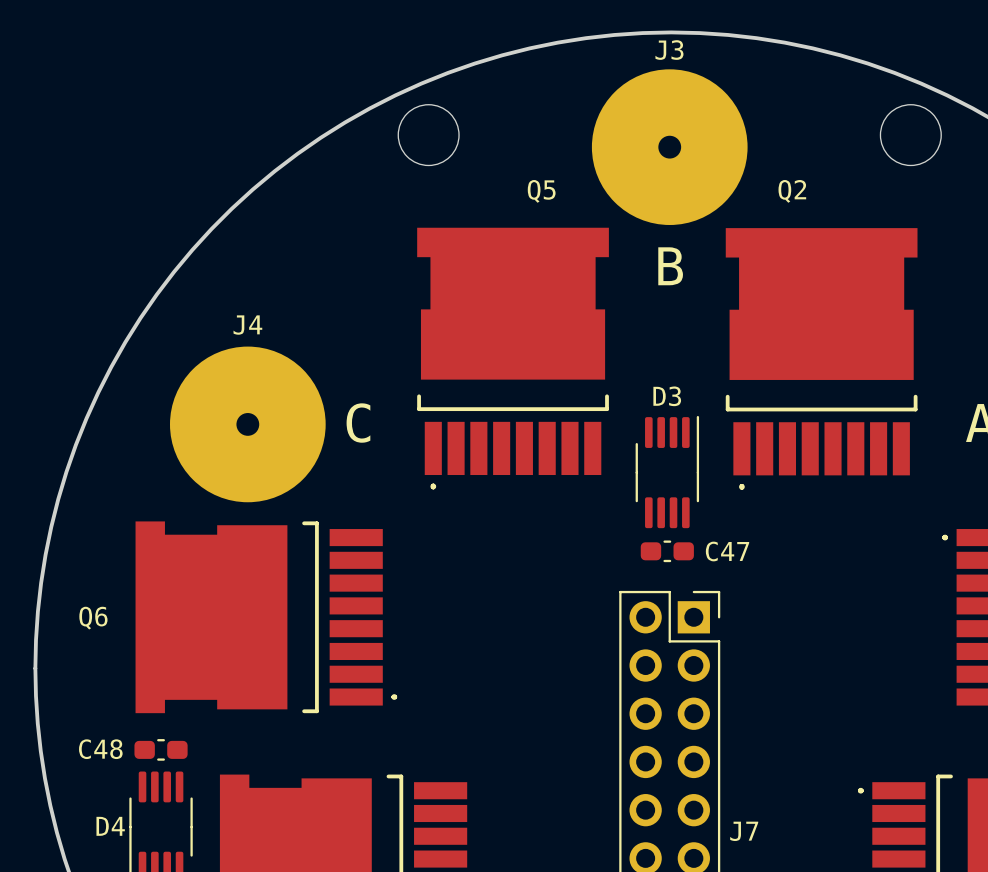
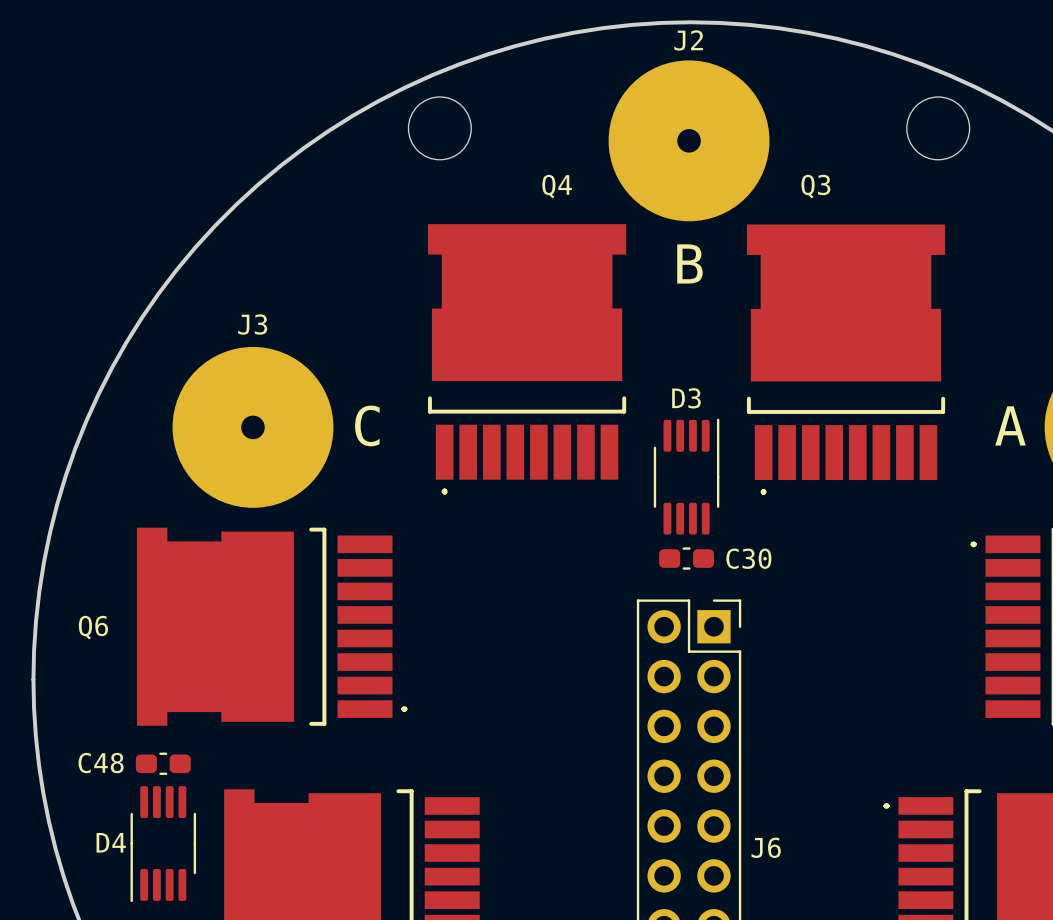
J3 name: J3 (669, 50) -> J2 (688, 40)
Q5 name: Q5 (541, 191) -> Q4 (557, 186)
Q2 name: Q2 (792, 191) -> Q3 (815, 186)
J4 name: J4 (247, 325) -> J3 (252, 324)
C47 name: C47 (727, 551) -> C30 (748, 558)
J7 name: J7 (744, 831) -> J6 (766, 847)

